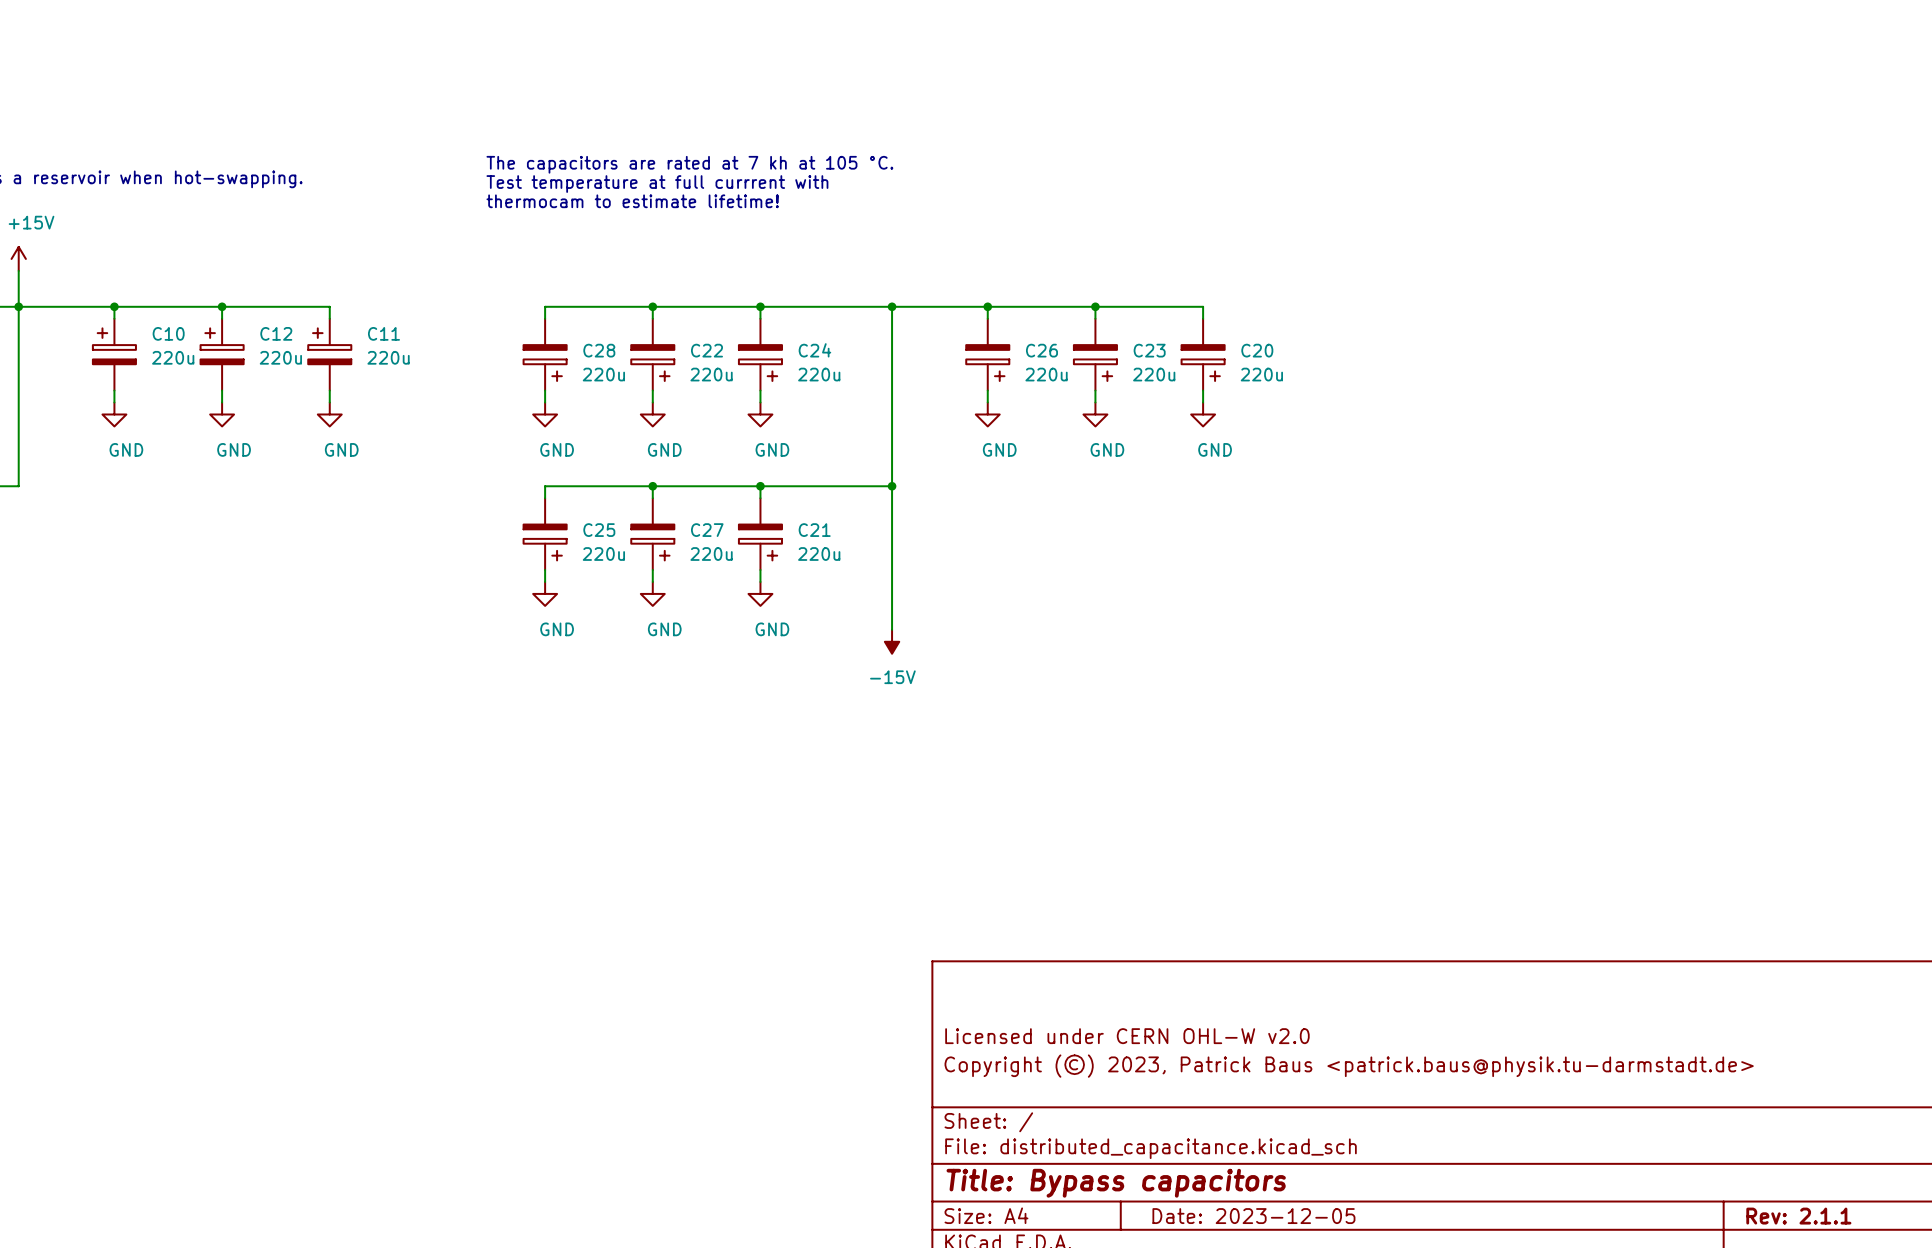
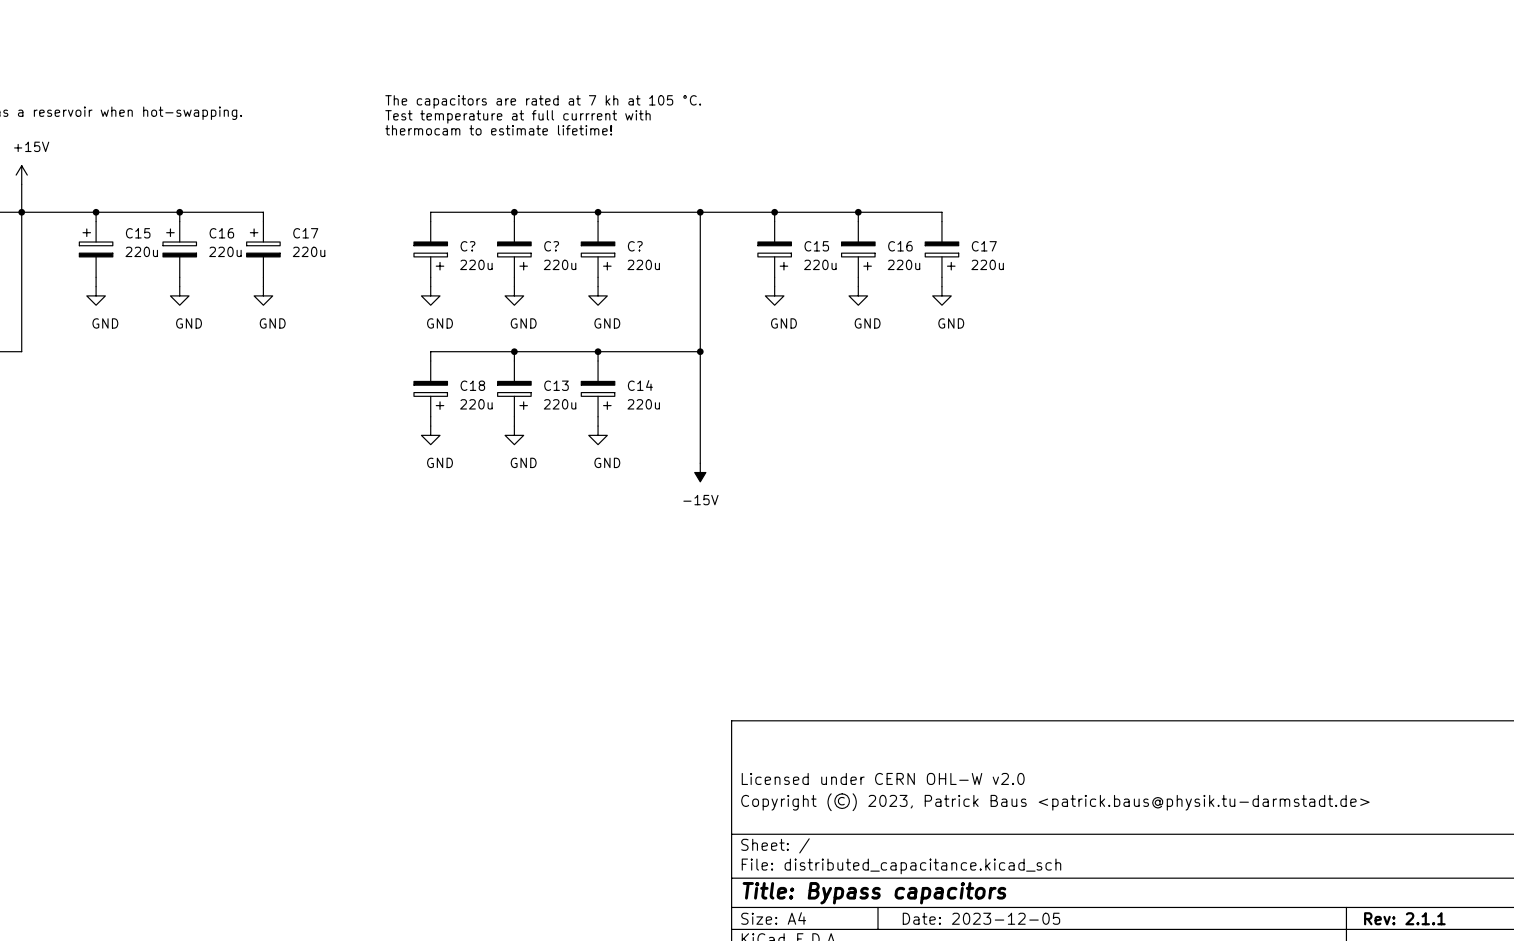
C10 name: C10 (168, 333) -> C15 (138, 233)
C12 name: C12 (276, 333) -> C16 (221, 233)
C11 name: C11 (383, 333) -> C17 (305, 233)
C28 name: C28 (599, 350) -> C? (467, 246)
C22 name: C22 (706, 350) -> C? (551, 246)
C24 name: C24 (814, 350) -> C? (635, 246)
C26 name: C26 (1041, 350) -> C15 (816, 246)
C23 name: C23 (1149, 350) -> C16 (900, 246)
C20 name: C20 (1257, 350) -> C17 (984, 246)
C25 name: C25 (599, 530) -> C18 (472, 385)
C27 name: C27 (707, 530) -> C13 (556, 385)
C21 name: C21 (814, 530) -> C14 (640, 385)

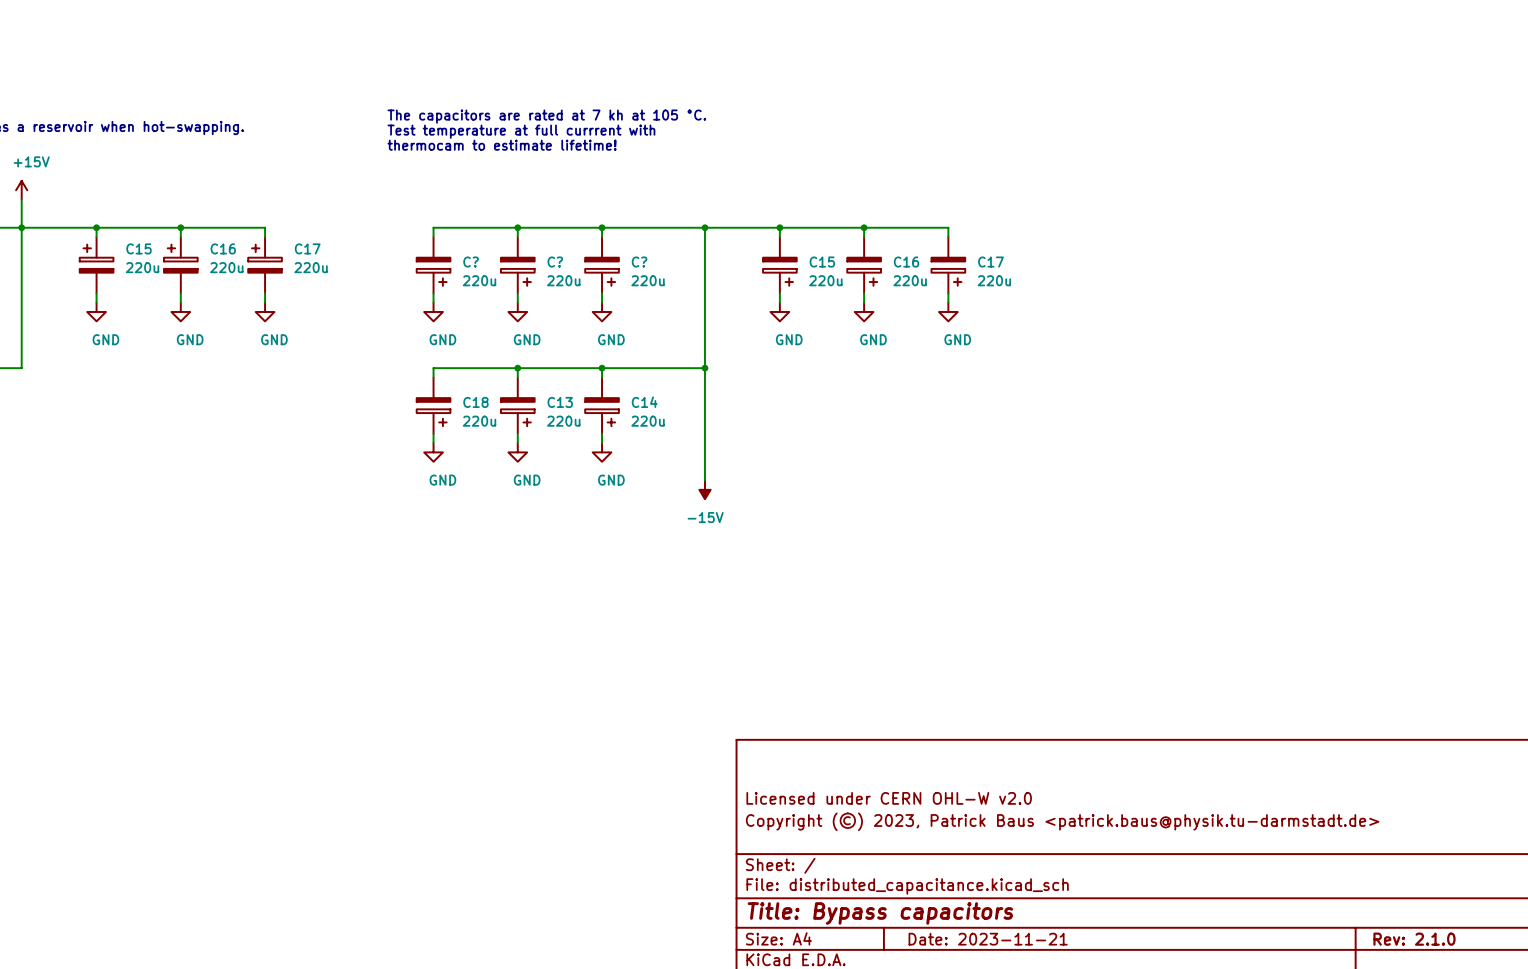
title block: Date: 2023-12-05 (981, 918) -> Date: 2023-11-21 (988, 939)
title block: Rev: 2.1.1 (1404, 918) -> Rev: 2.1.0 (1414, 939)

